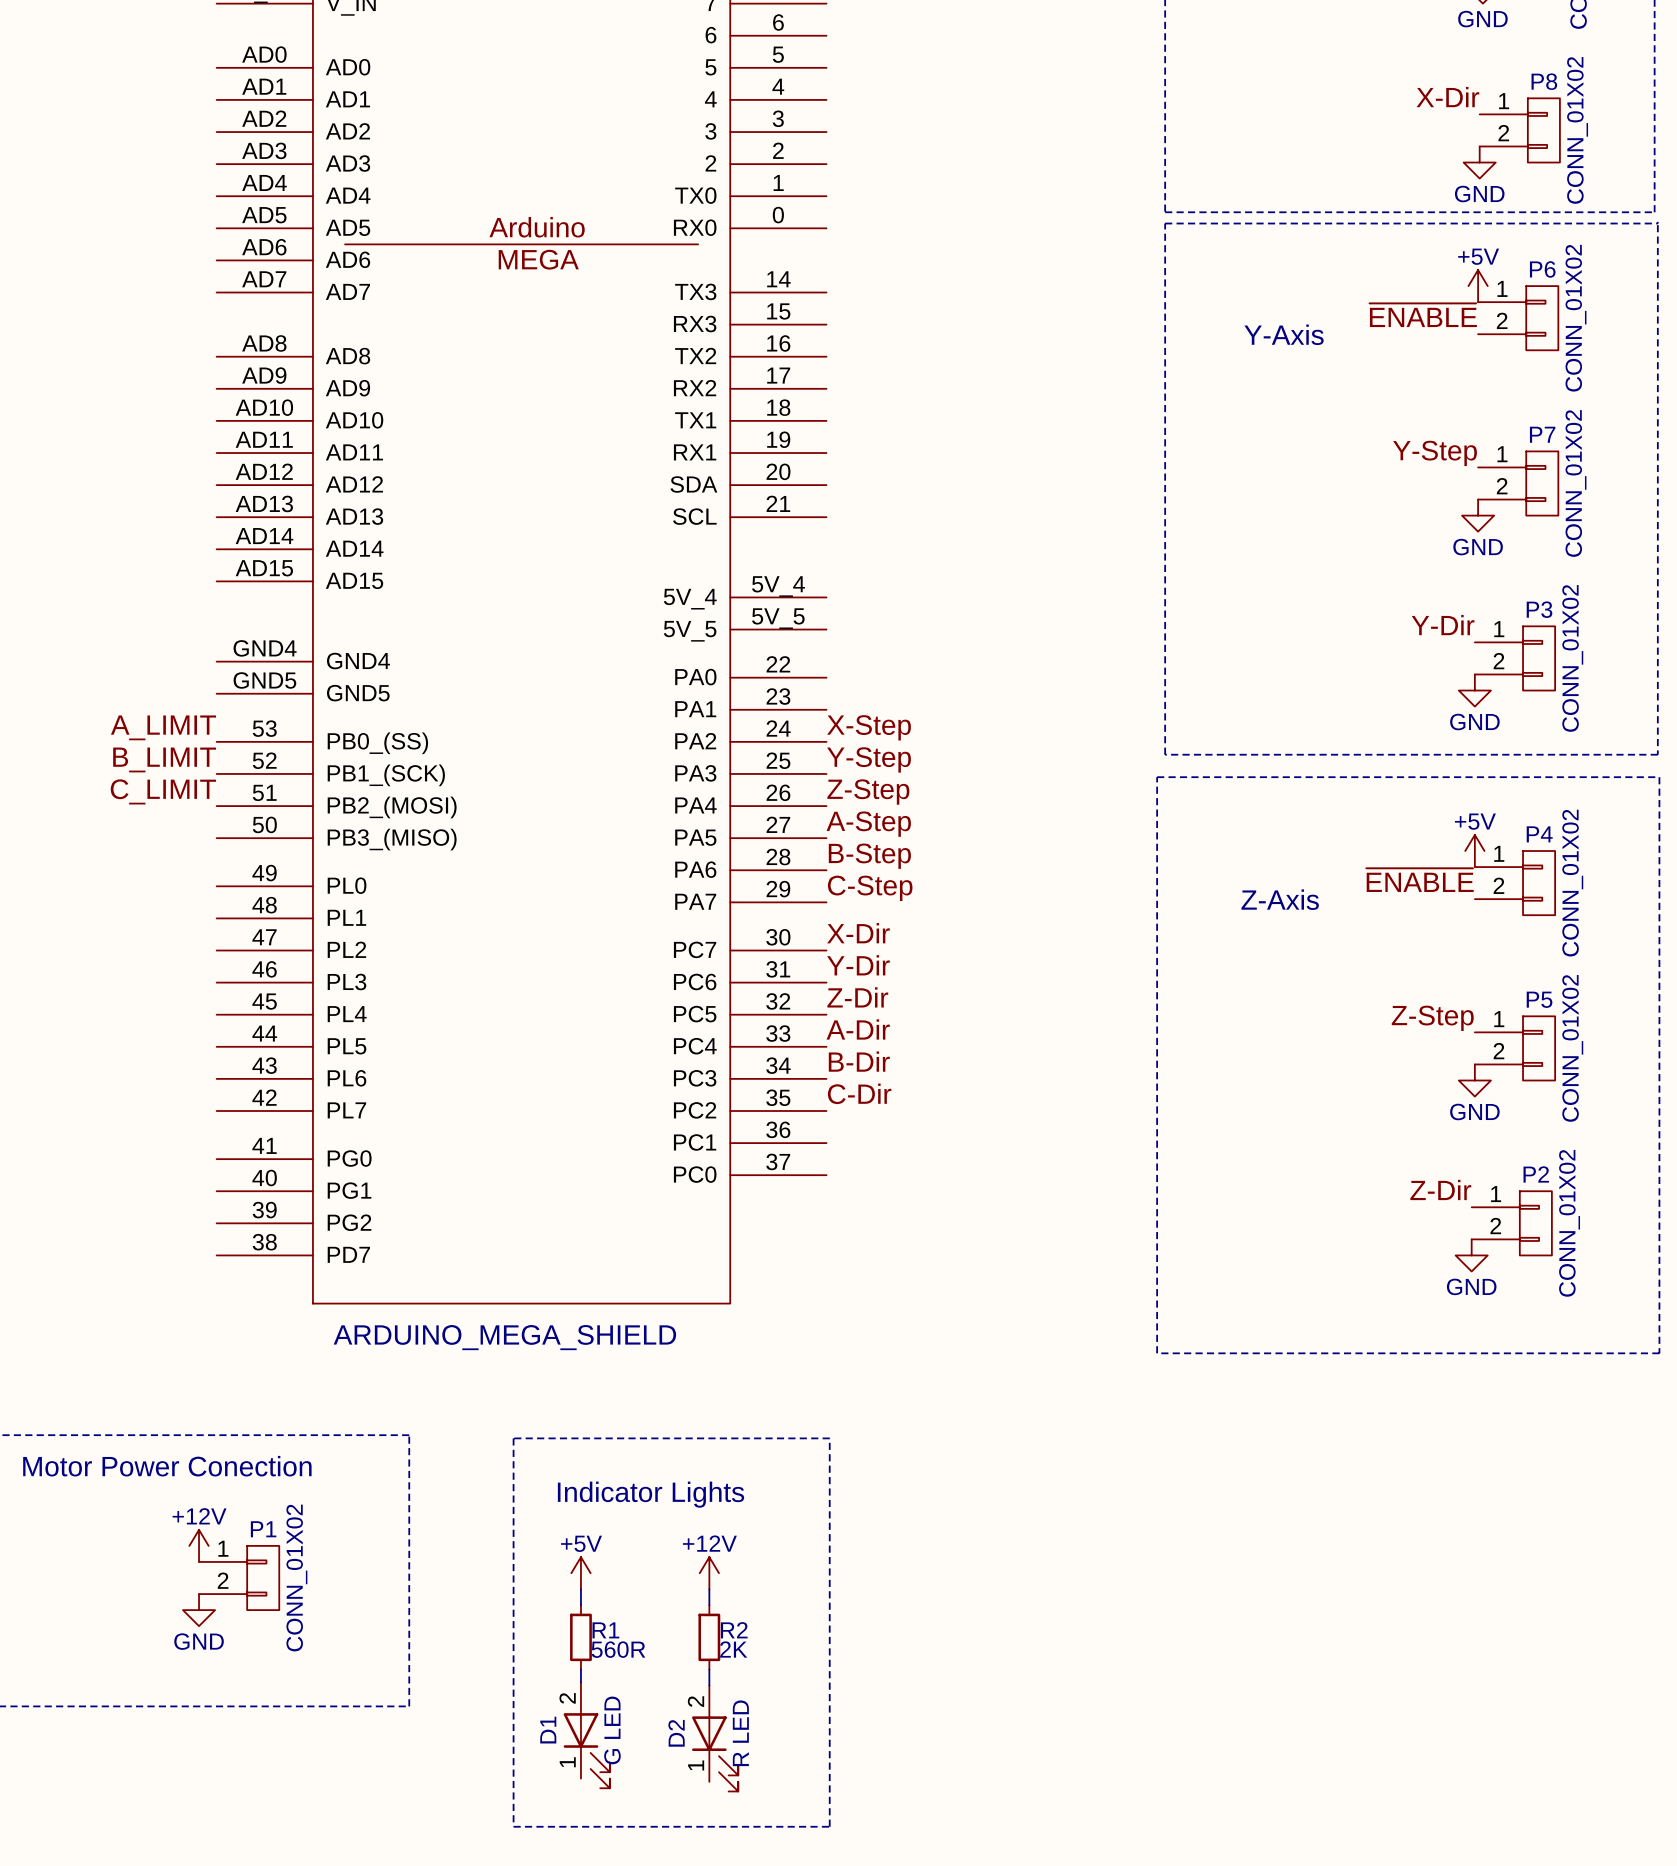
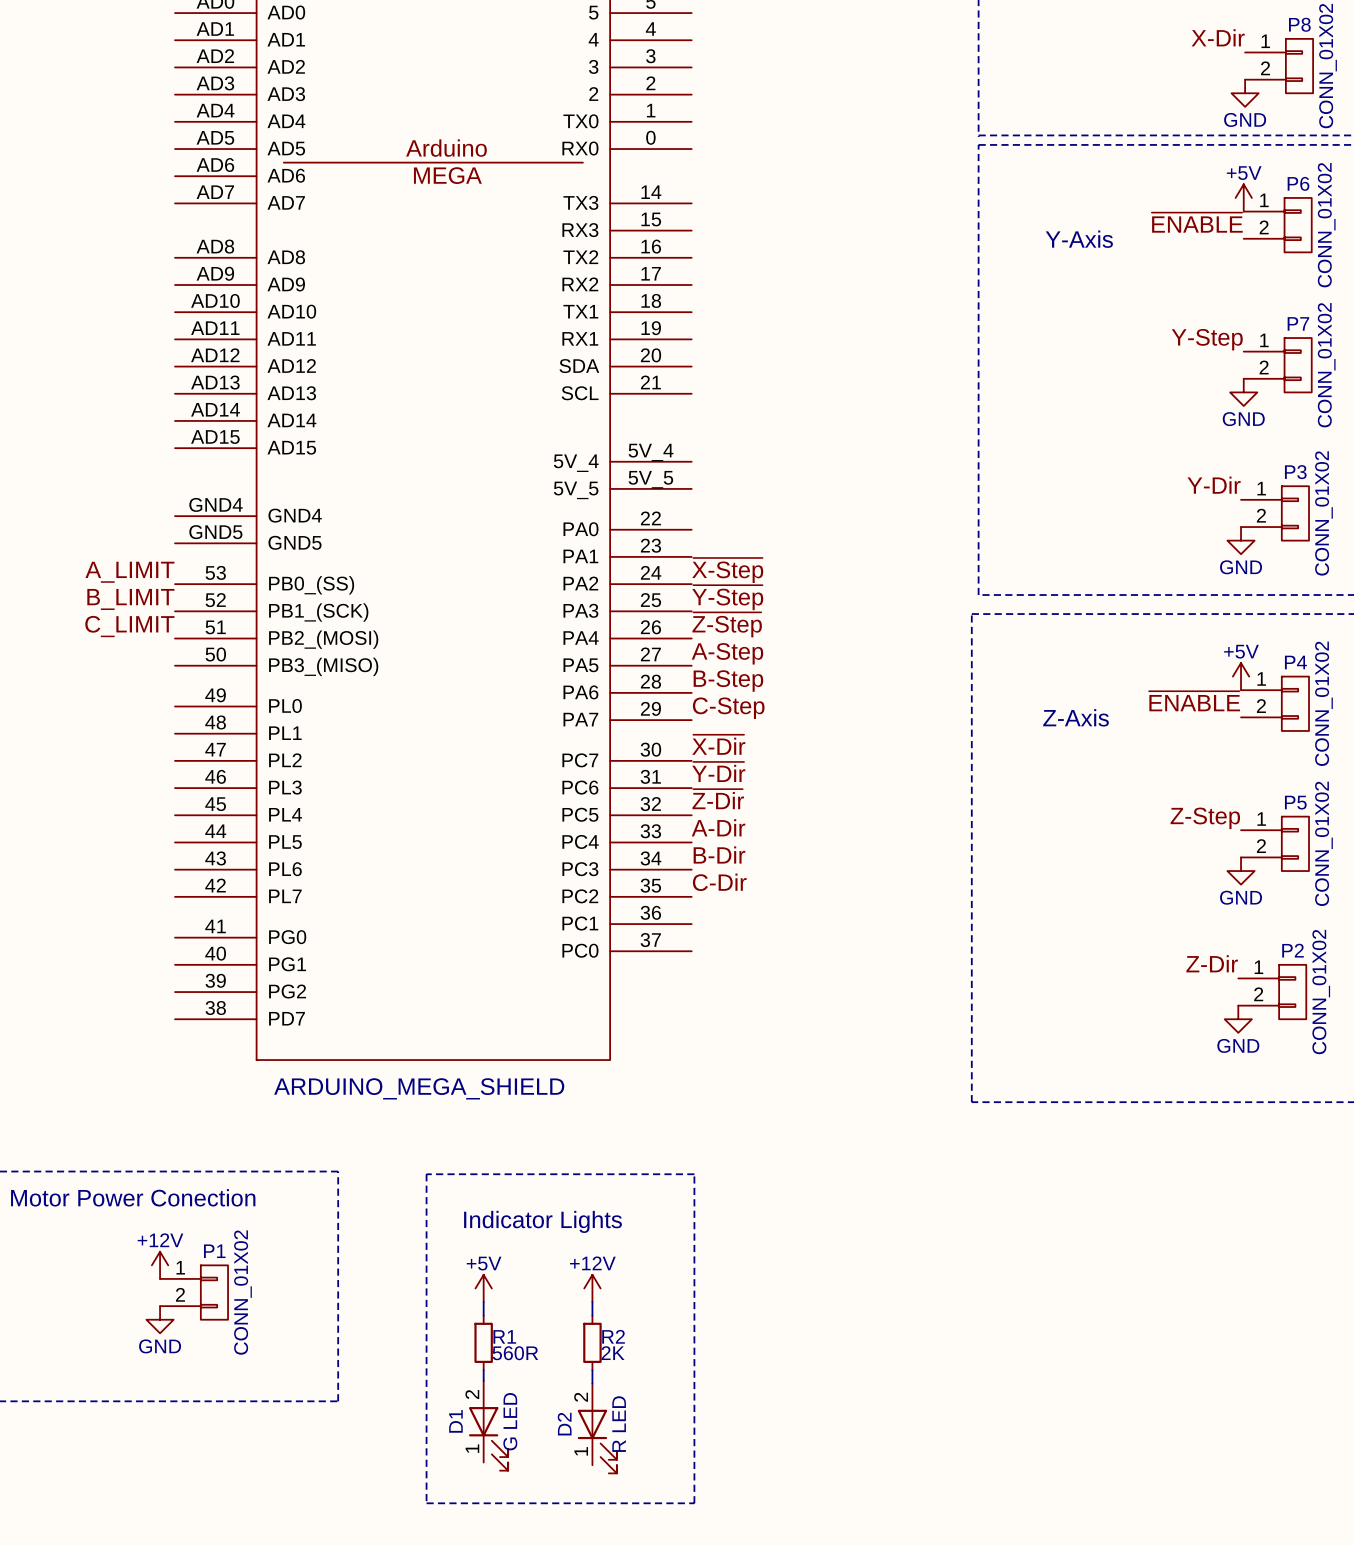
label: X-Step (869, 727) -> ~{X-Step} (727, 570)
label: Y-Step (869, 759) -> ~{Y-Step} (727, 597)
label: Z-Step (868, 792) -> ~{Z-Step} (727, 624)
label: X-Dir (858, 933) -> ~{X-Dir} (718, 744)
label: Y-Dir (858, 965) -> ~{Y-Dir} (718, 771)
label: Z-Dir (857, 997) -> ~{Z-Dir} (718, 799)

